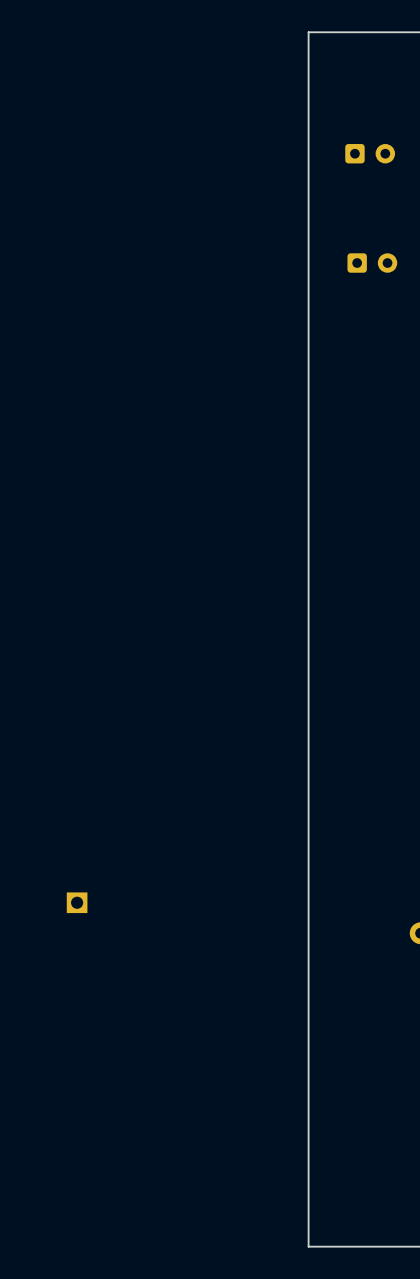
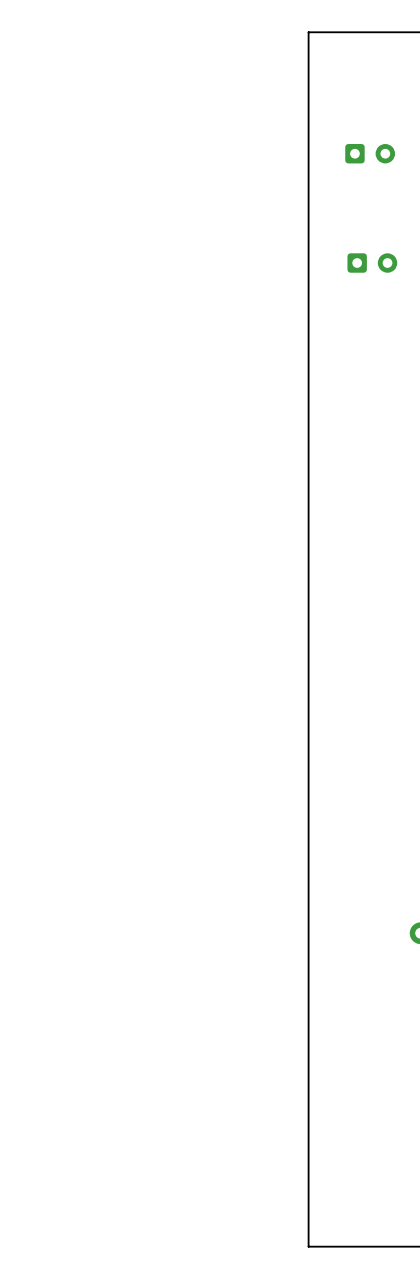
part: (77, 902) -> none

